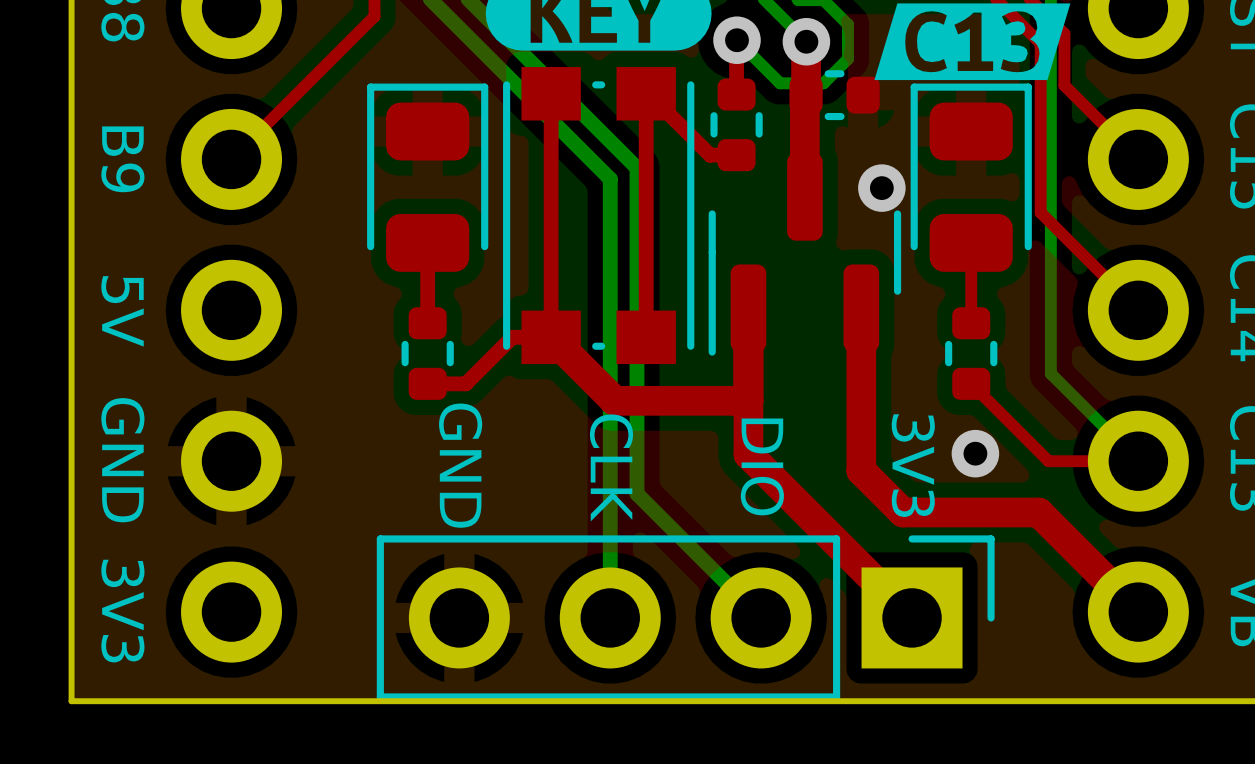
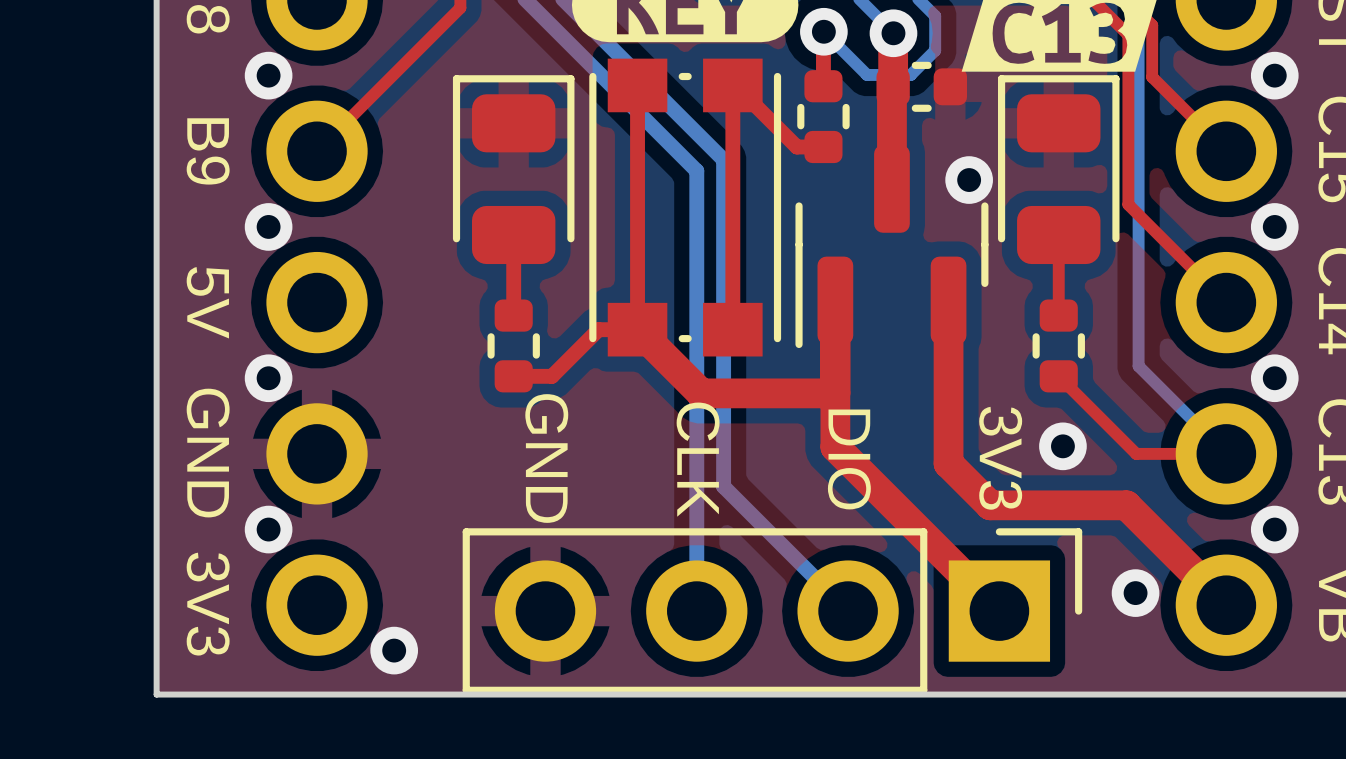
via: none -> (268, 75)
via: none -> (1274, 75)
via: none -> (268, 226)
via: none -> (1274, 226)
via: none -> (268, 378)
via: none -> (1274, 378)
via: none -> (268, 529)
via: none -> (1274, 529)
via: none -> (1135, 593)
via: none -> (394, 650)

